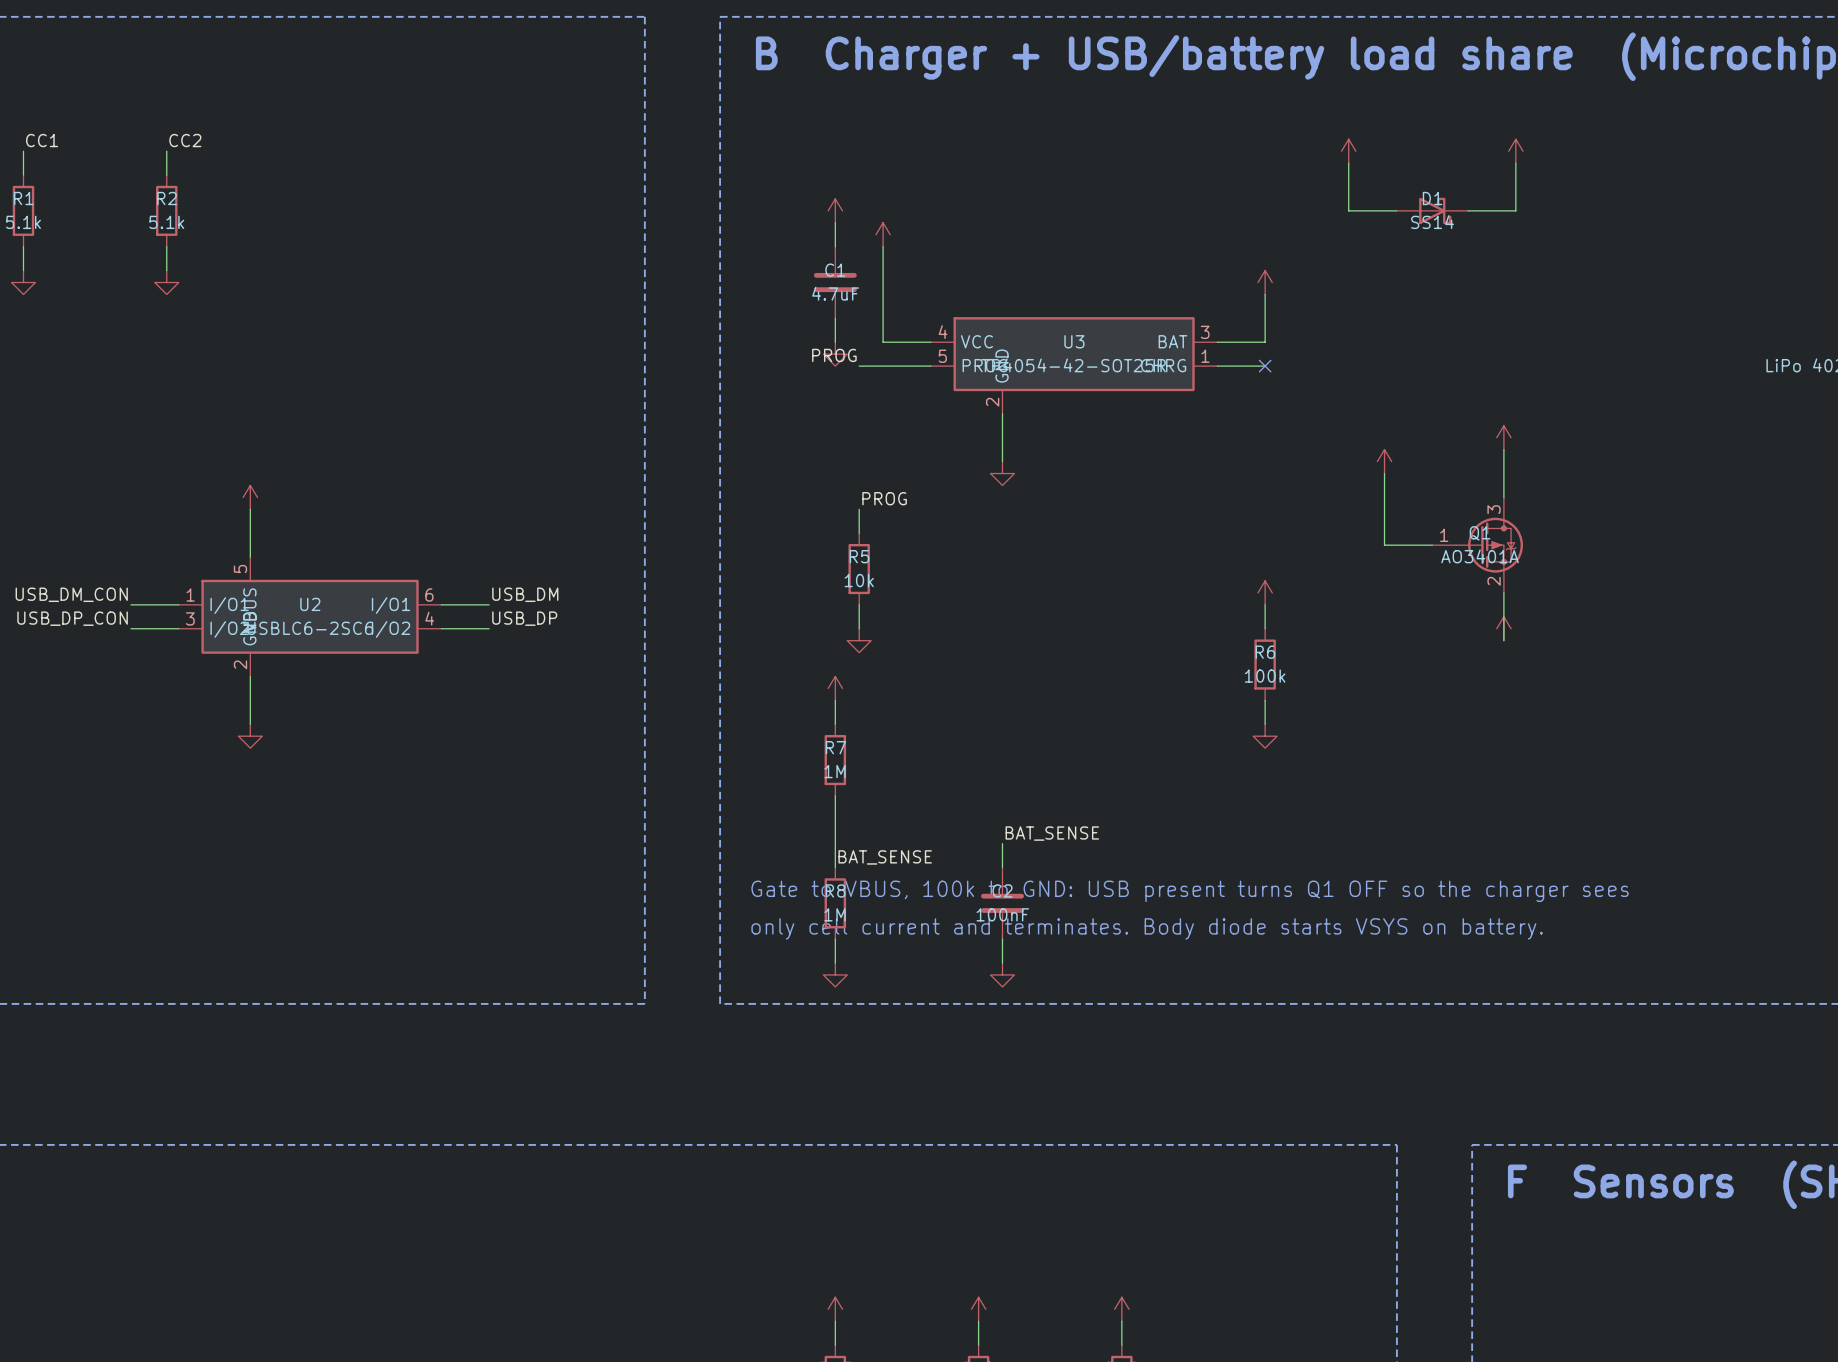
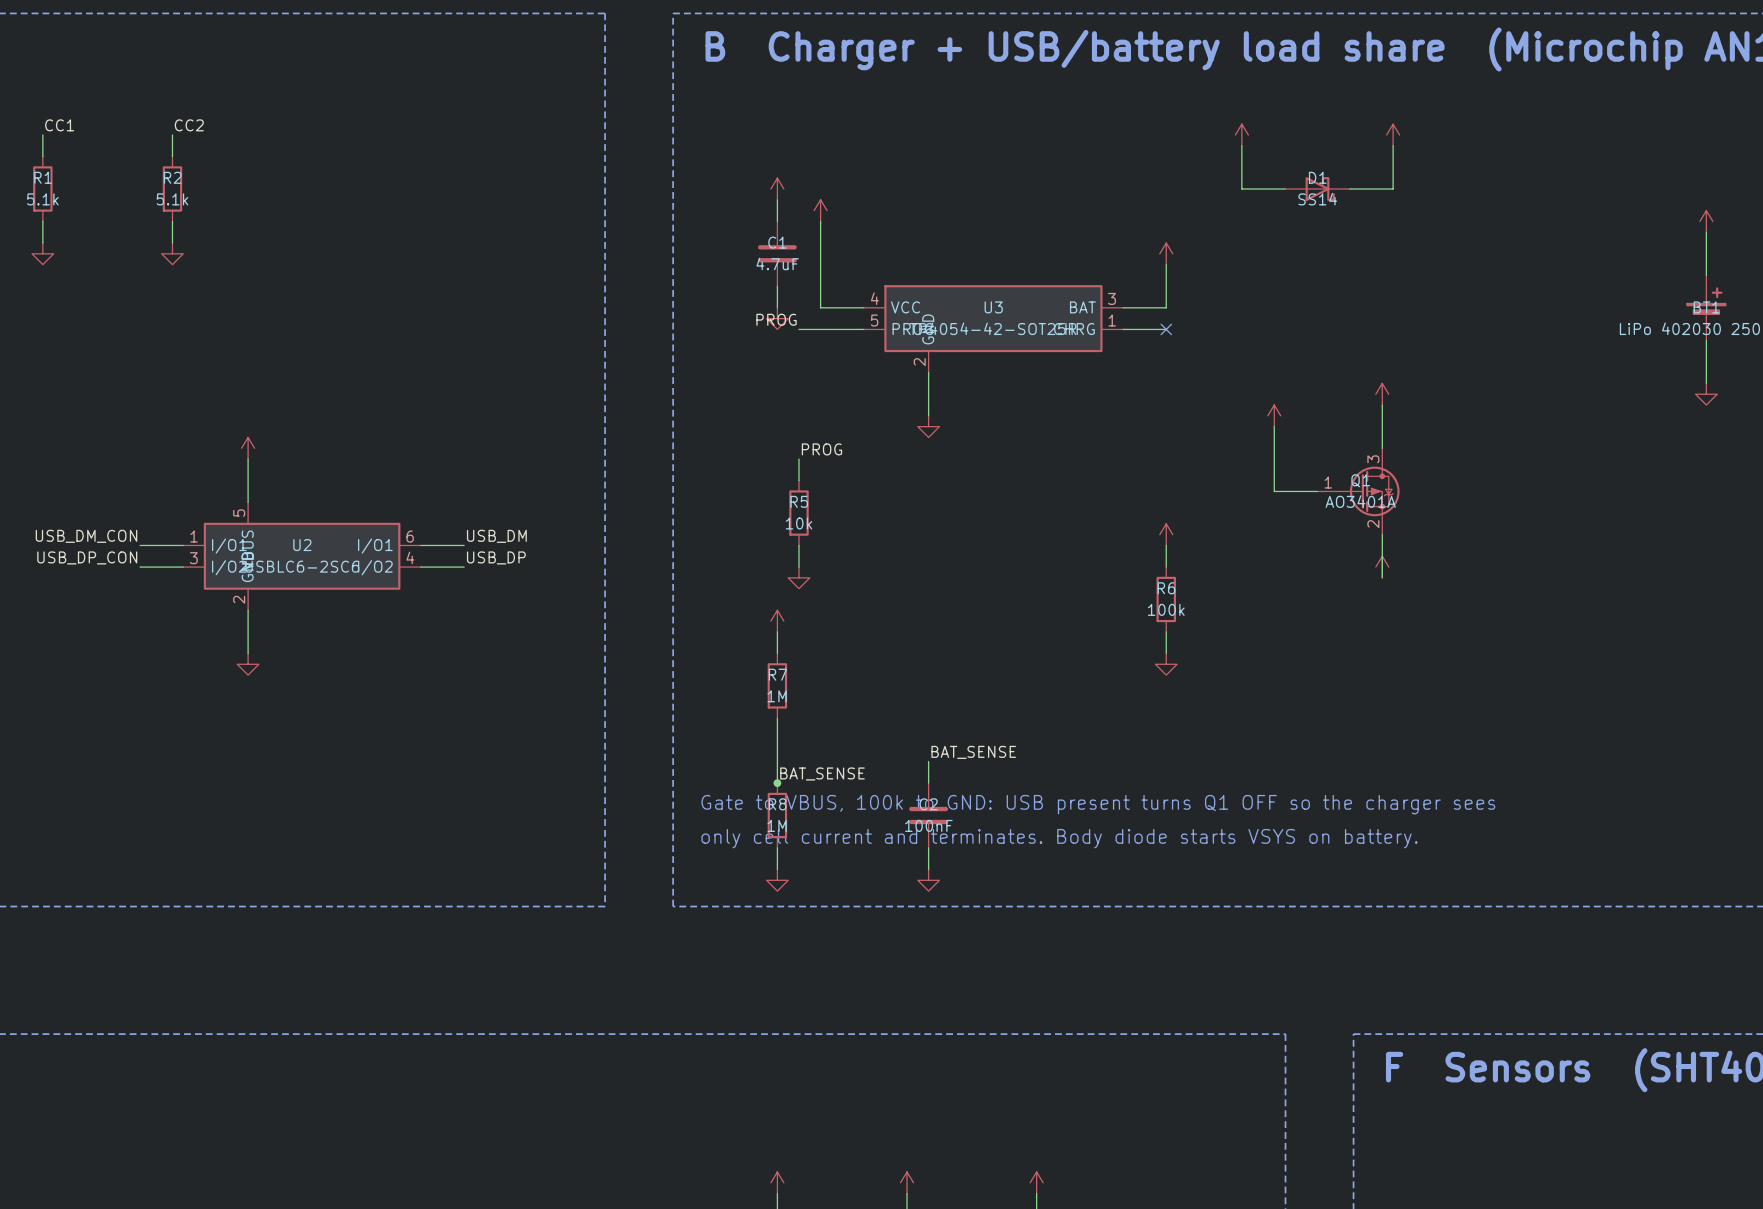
junction: none -> (777, 783)

